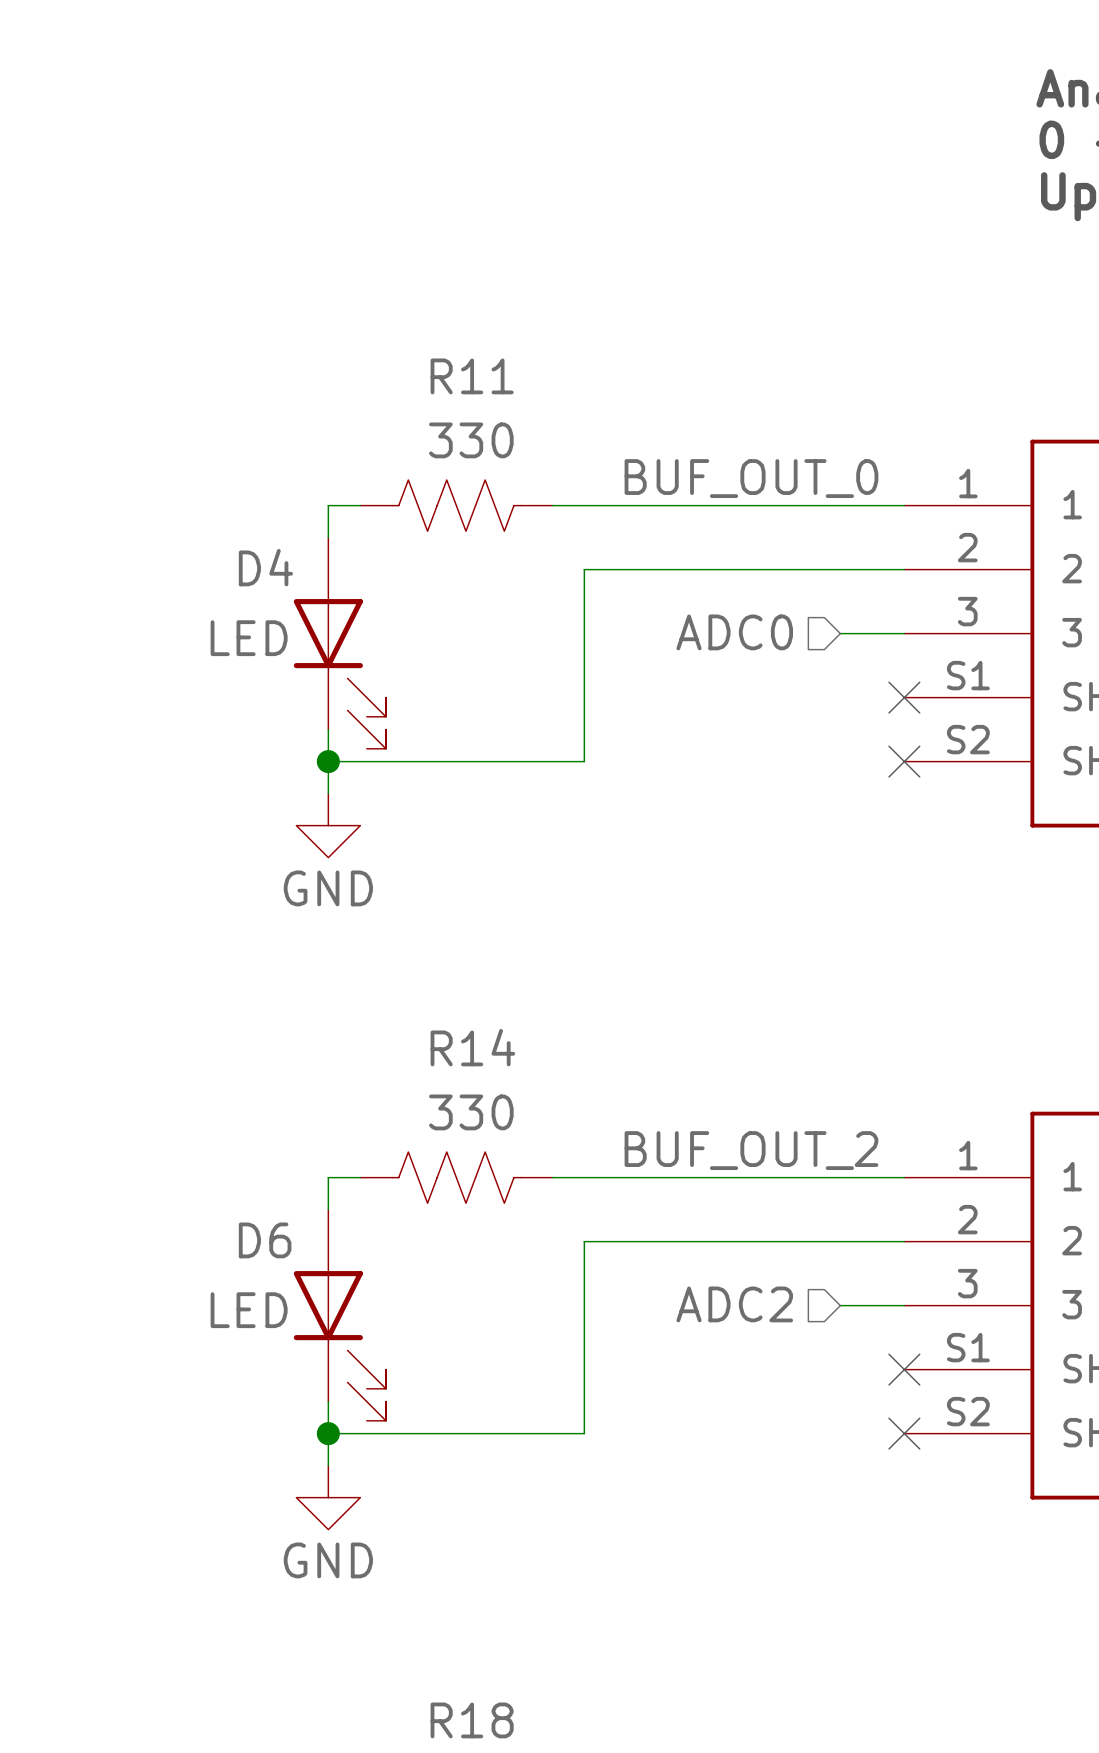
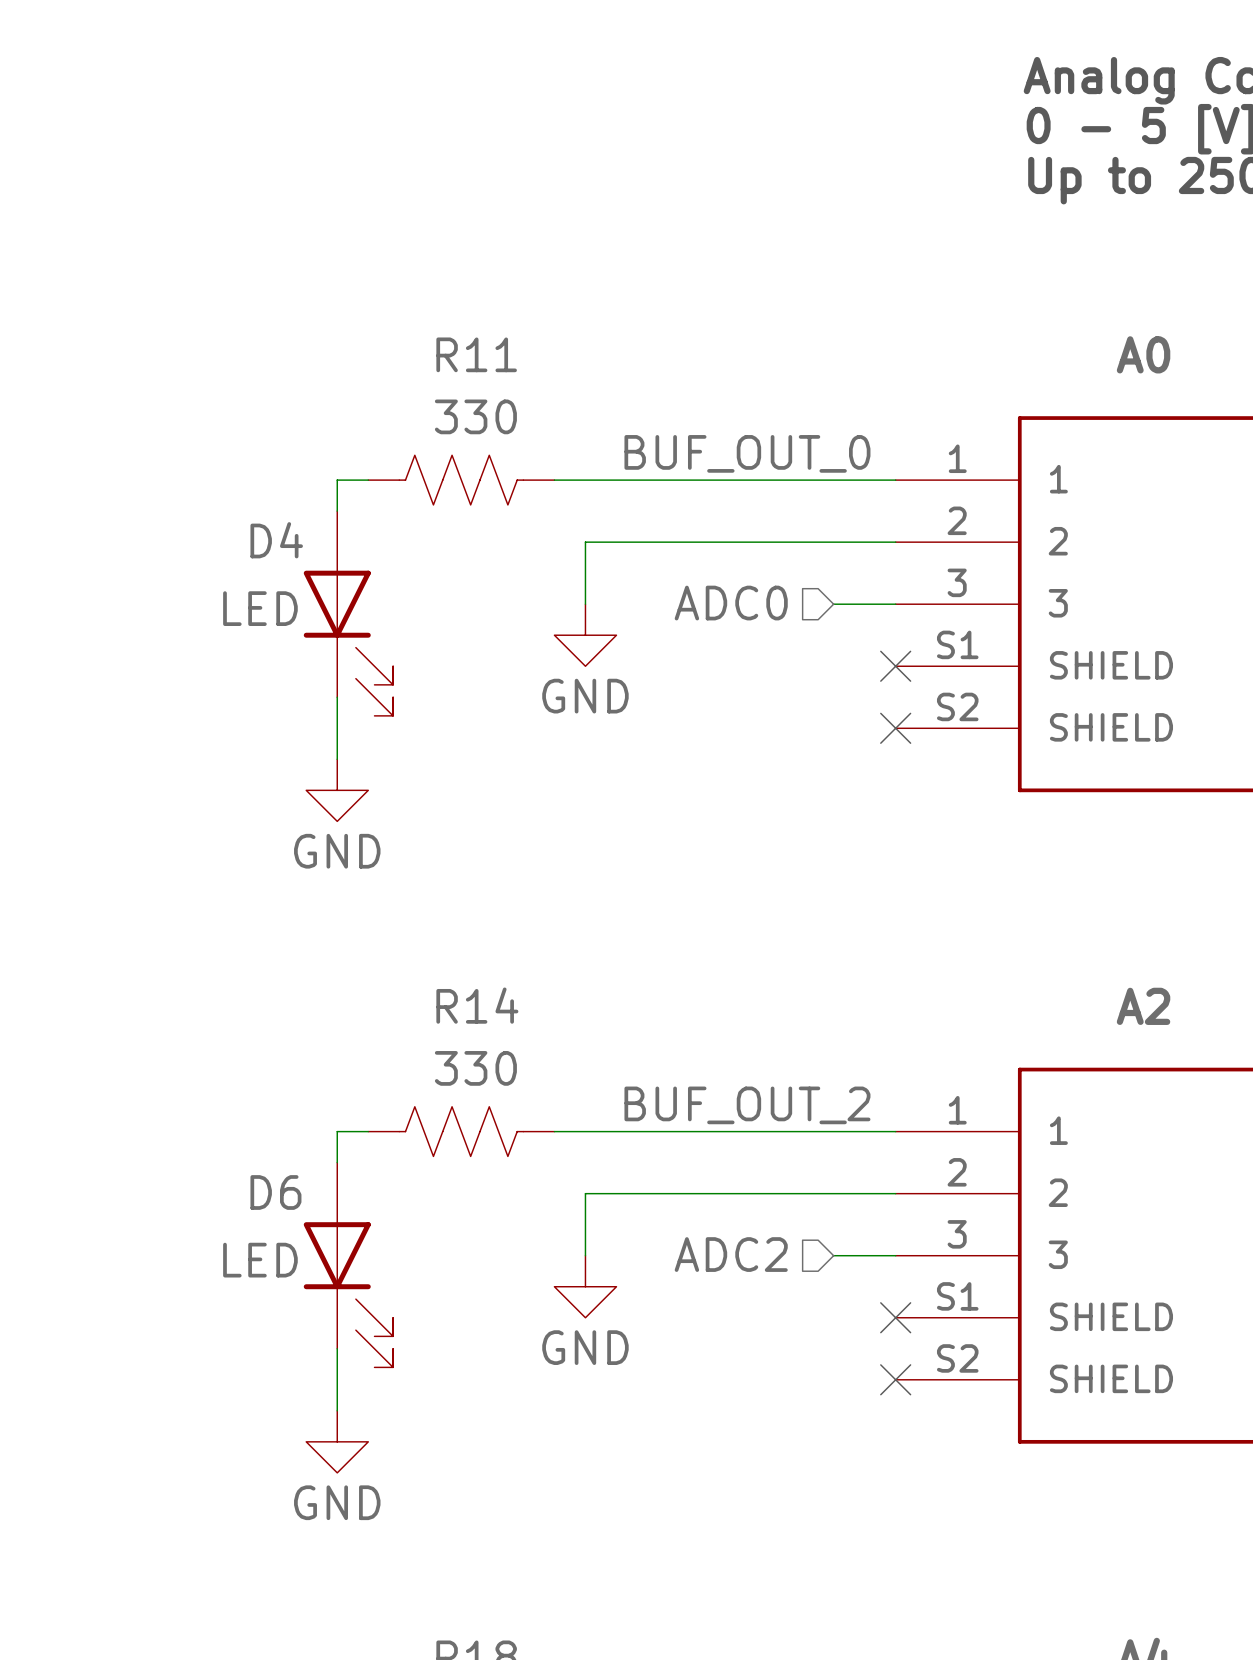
wire: (584, 633) (584, 761) (328, 761) -> none
power symbol: none -> GND (585, 635)
junction: (328, 761) -> none
wire: (584, 1305) (584, 1433) (328, 1433) -> none
power symbol: none -> GND (585, 1286)
junction: (328, 1433) -> none

